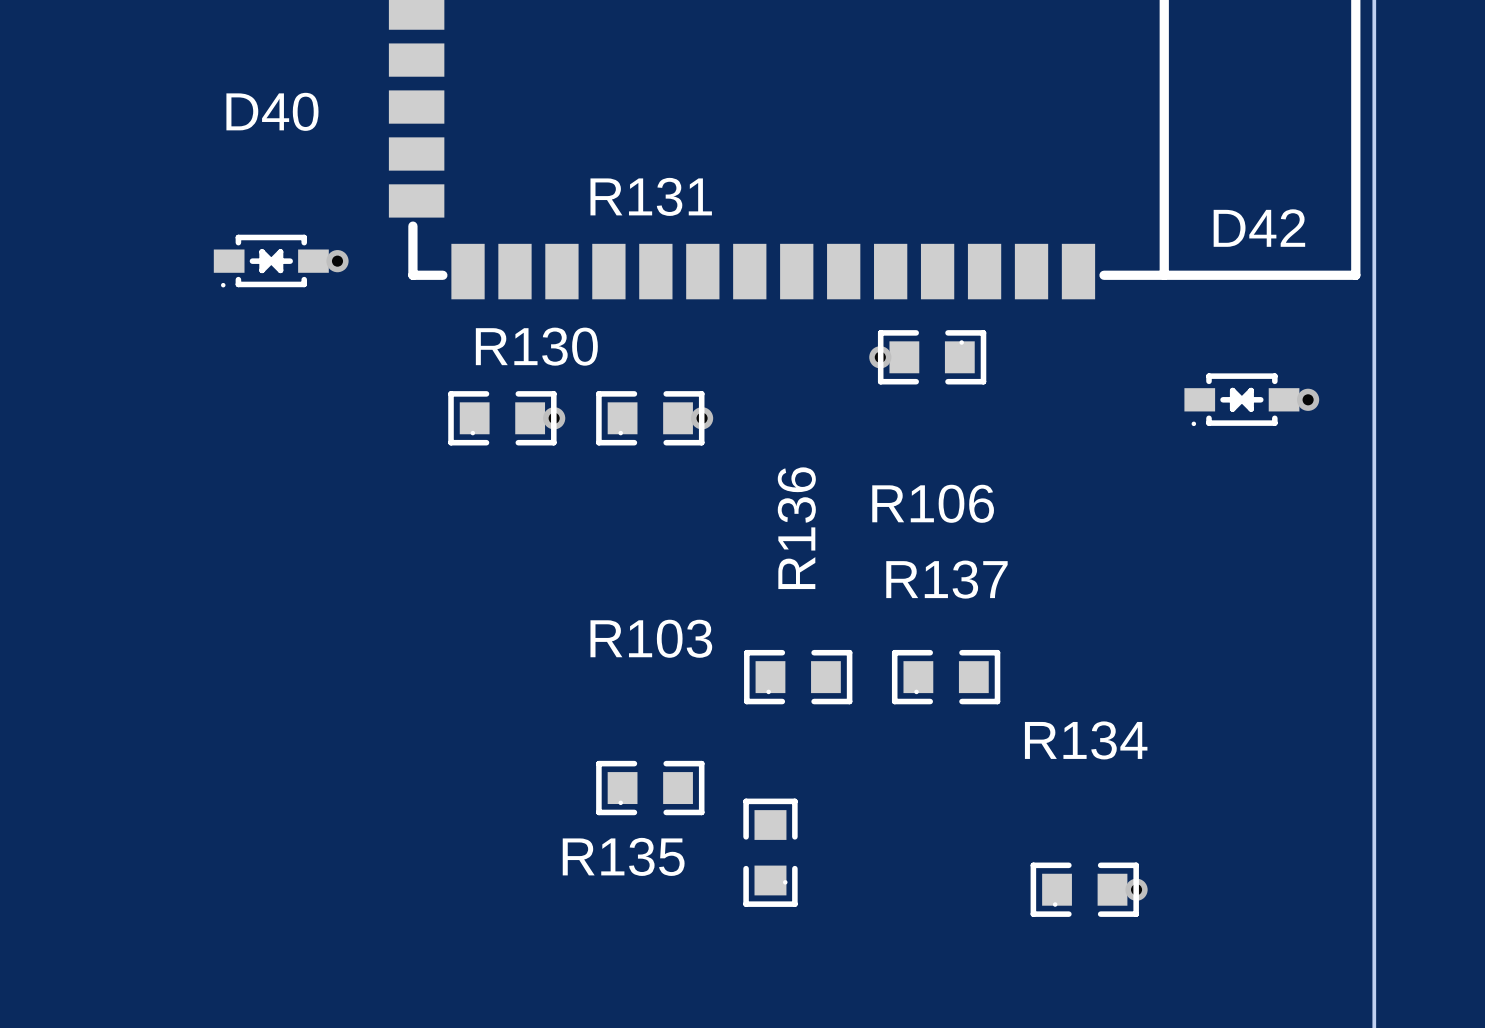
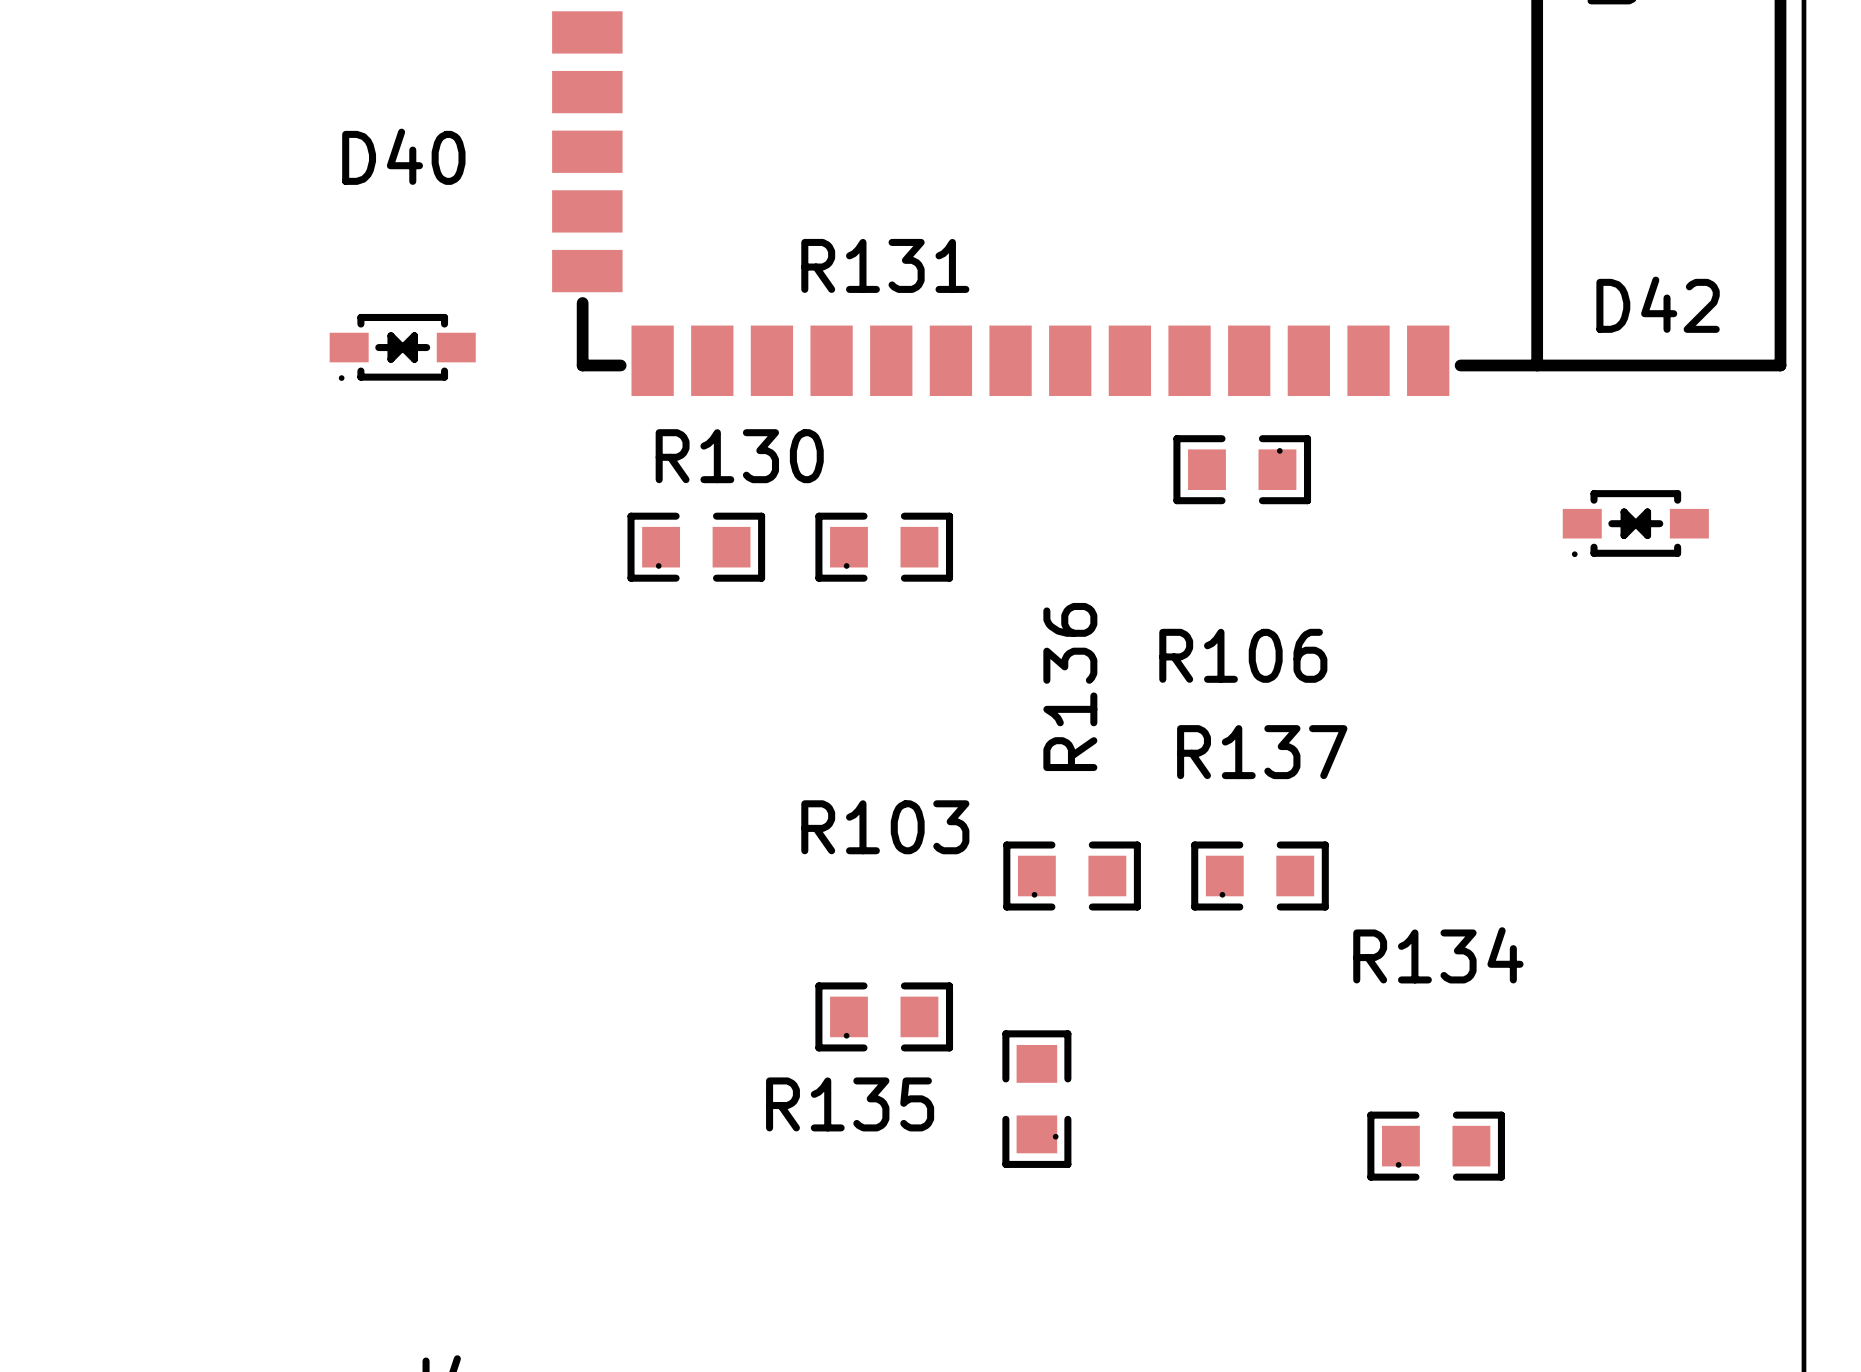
via: (337, 261) -> none
via: (880, 357) -> none
via: (1308, 399) -> none
via: (554, 418) -> none
via: (702, 418) -> none
via: (1136, 889) -> none

